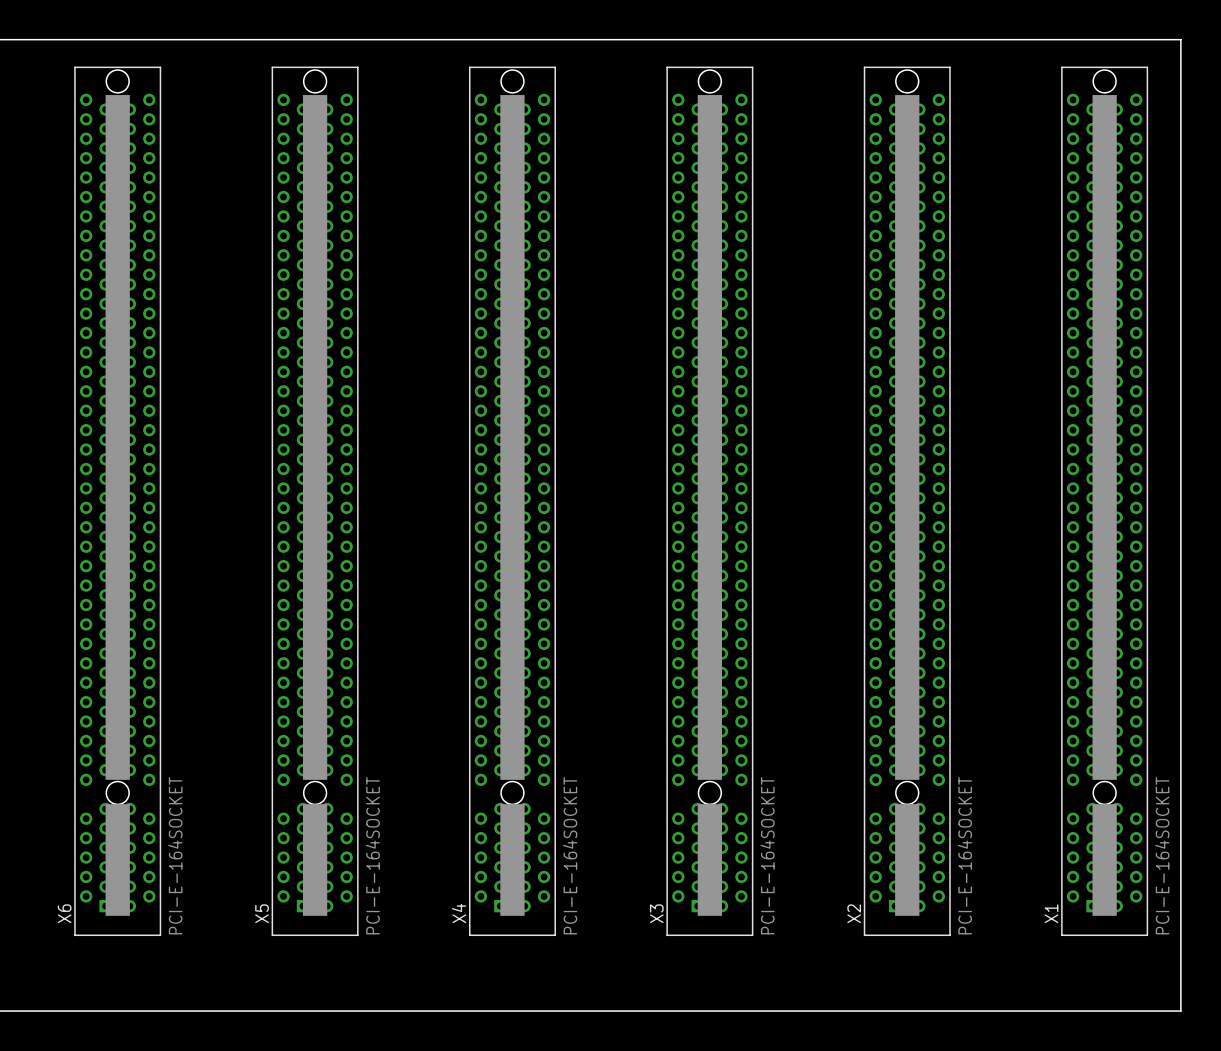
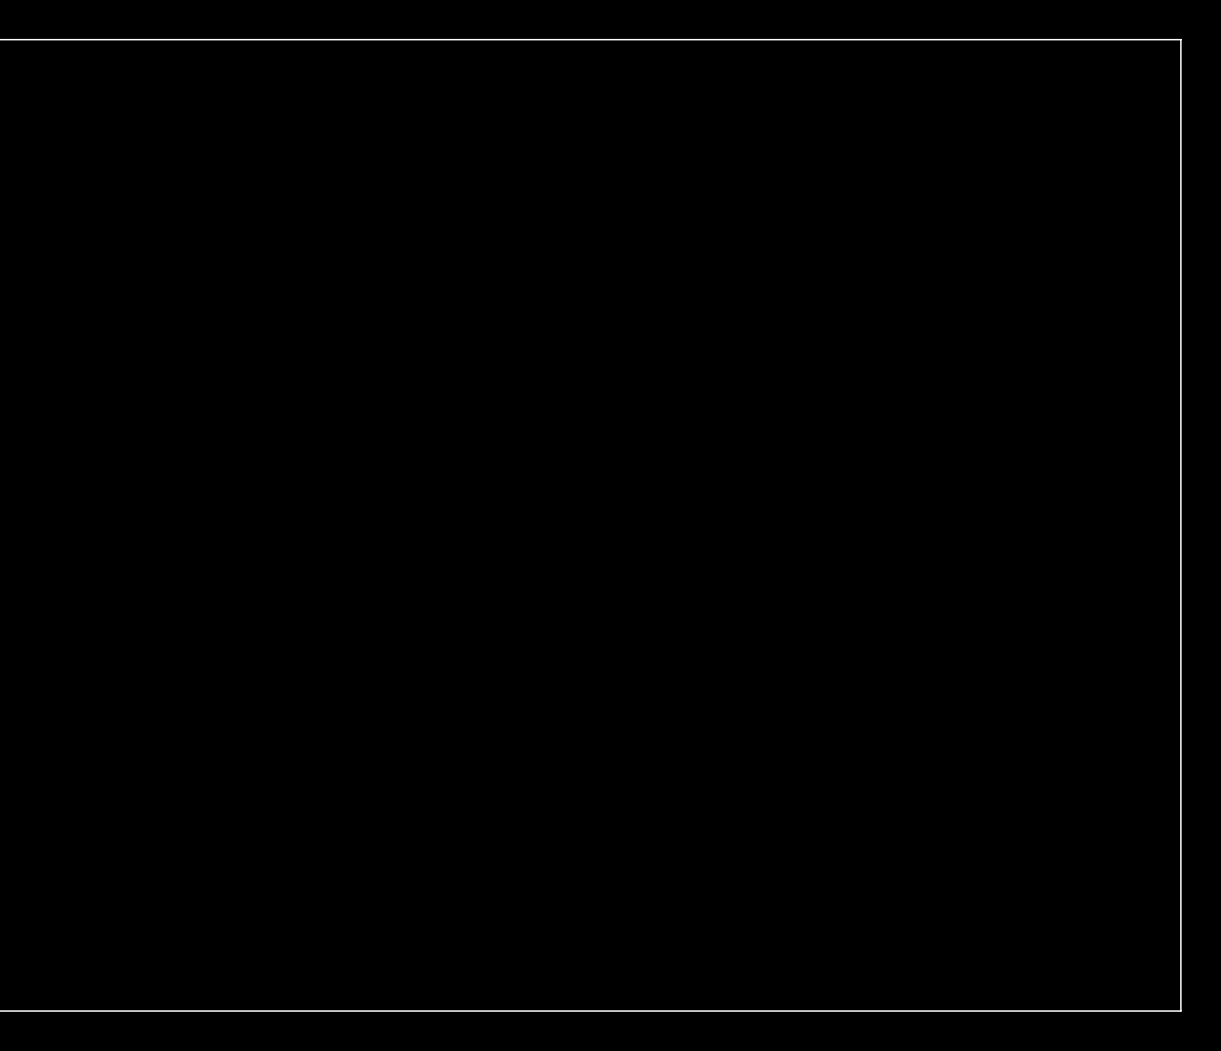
X6: PCI-E-164SOCKET (117, 501) -> none
X5: PCI-E-164SOCKET (315, 501) -> none
X4: PCI-E-164SOCKET (512, 501) -> none
X3: PCI-E-164SOCKET (709, 501) -> none
X2: PCI-E-164SOCKET (907, 501) -> none
X1: PCI-E-164SOCKET (1104, 501) -> none

